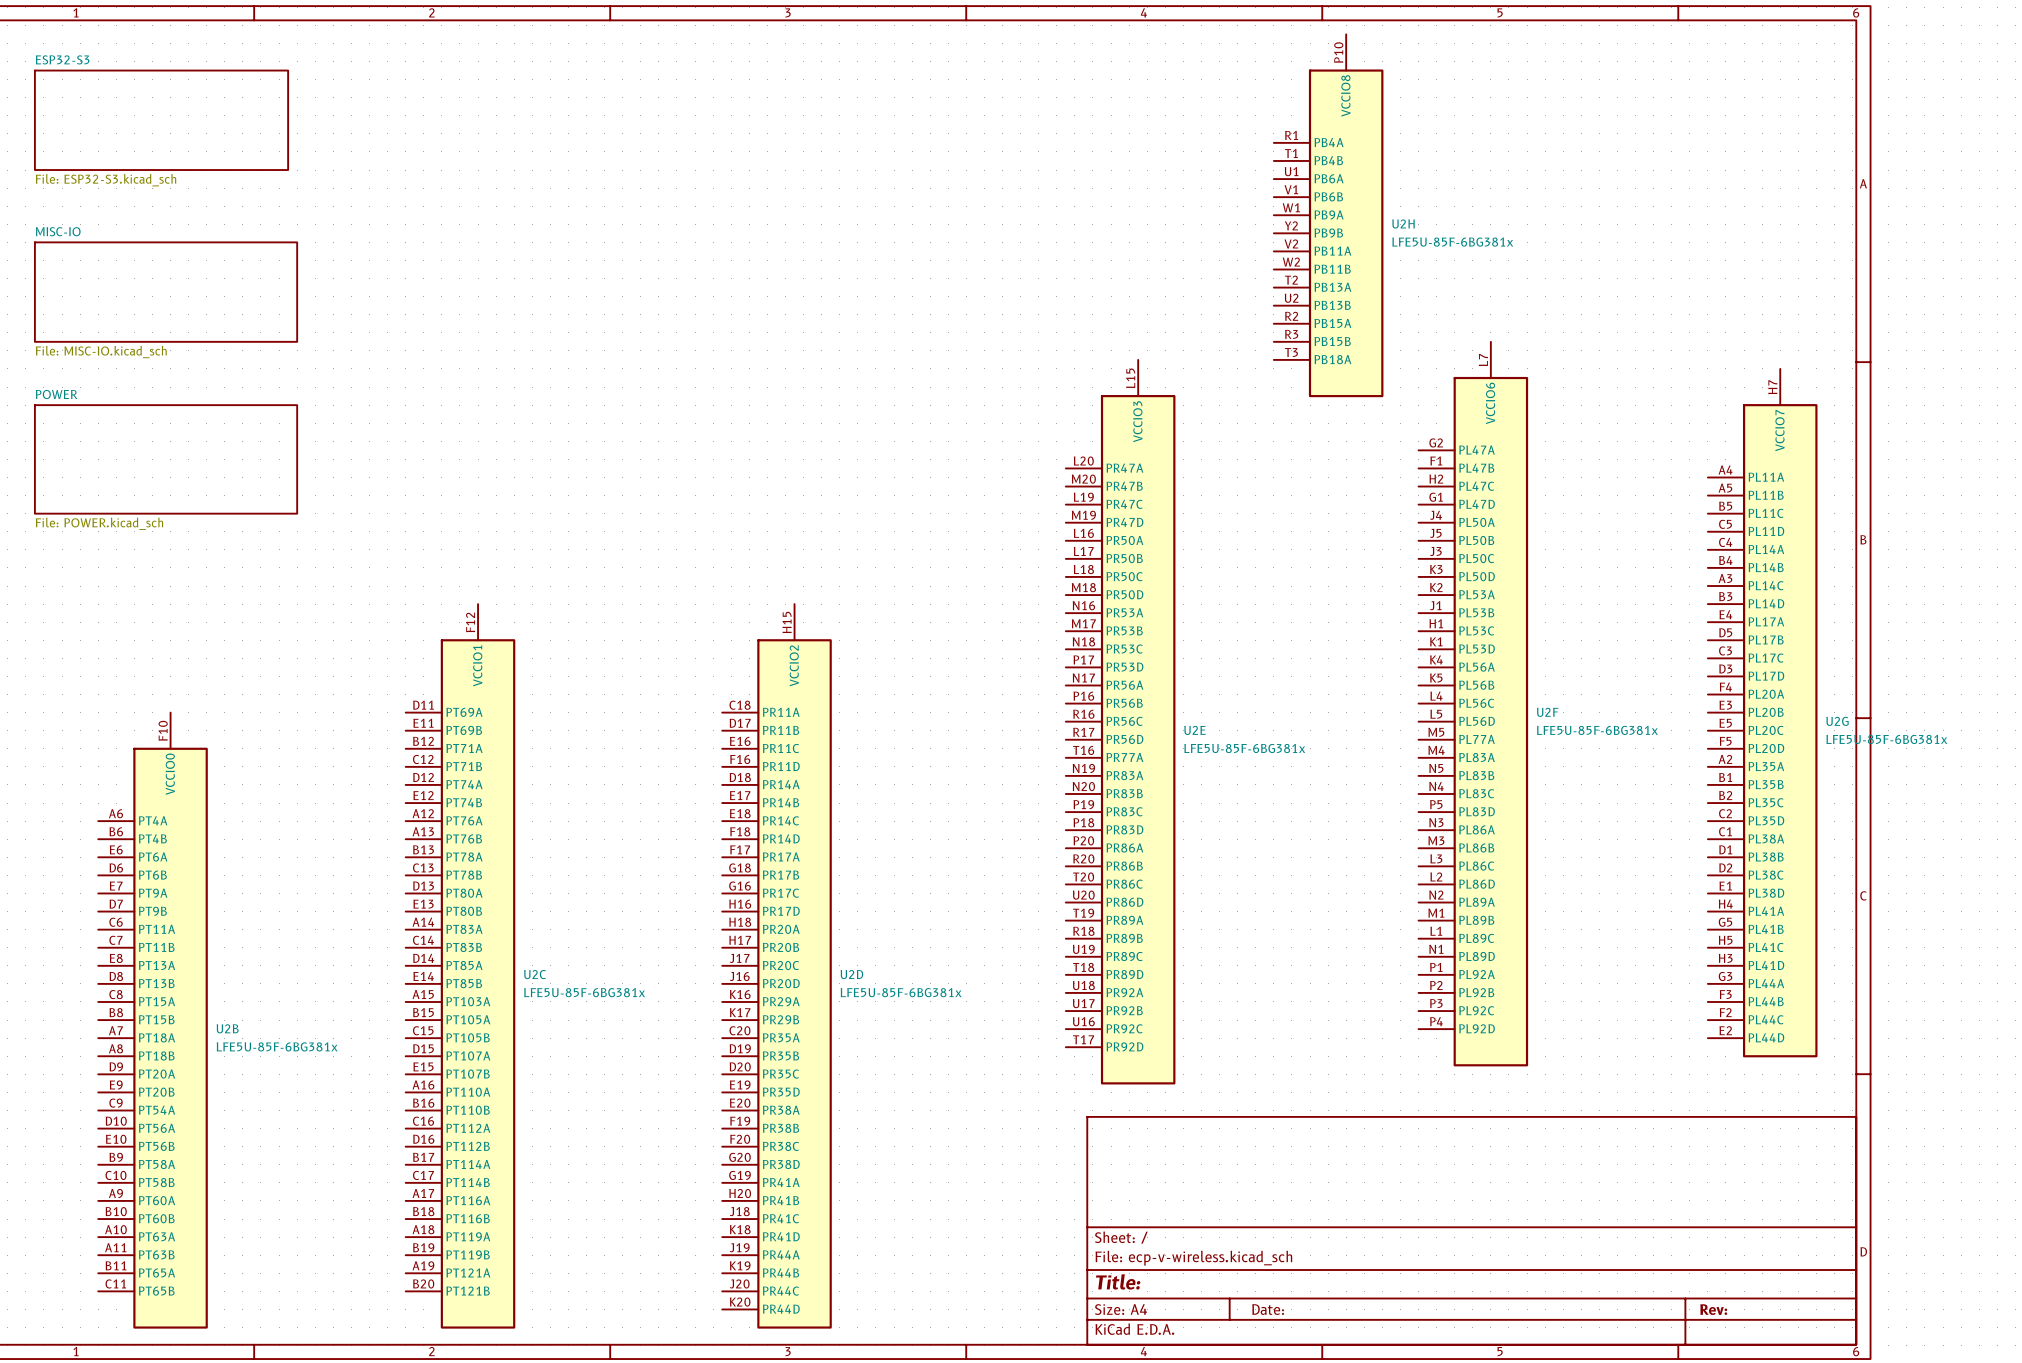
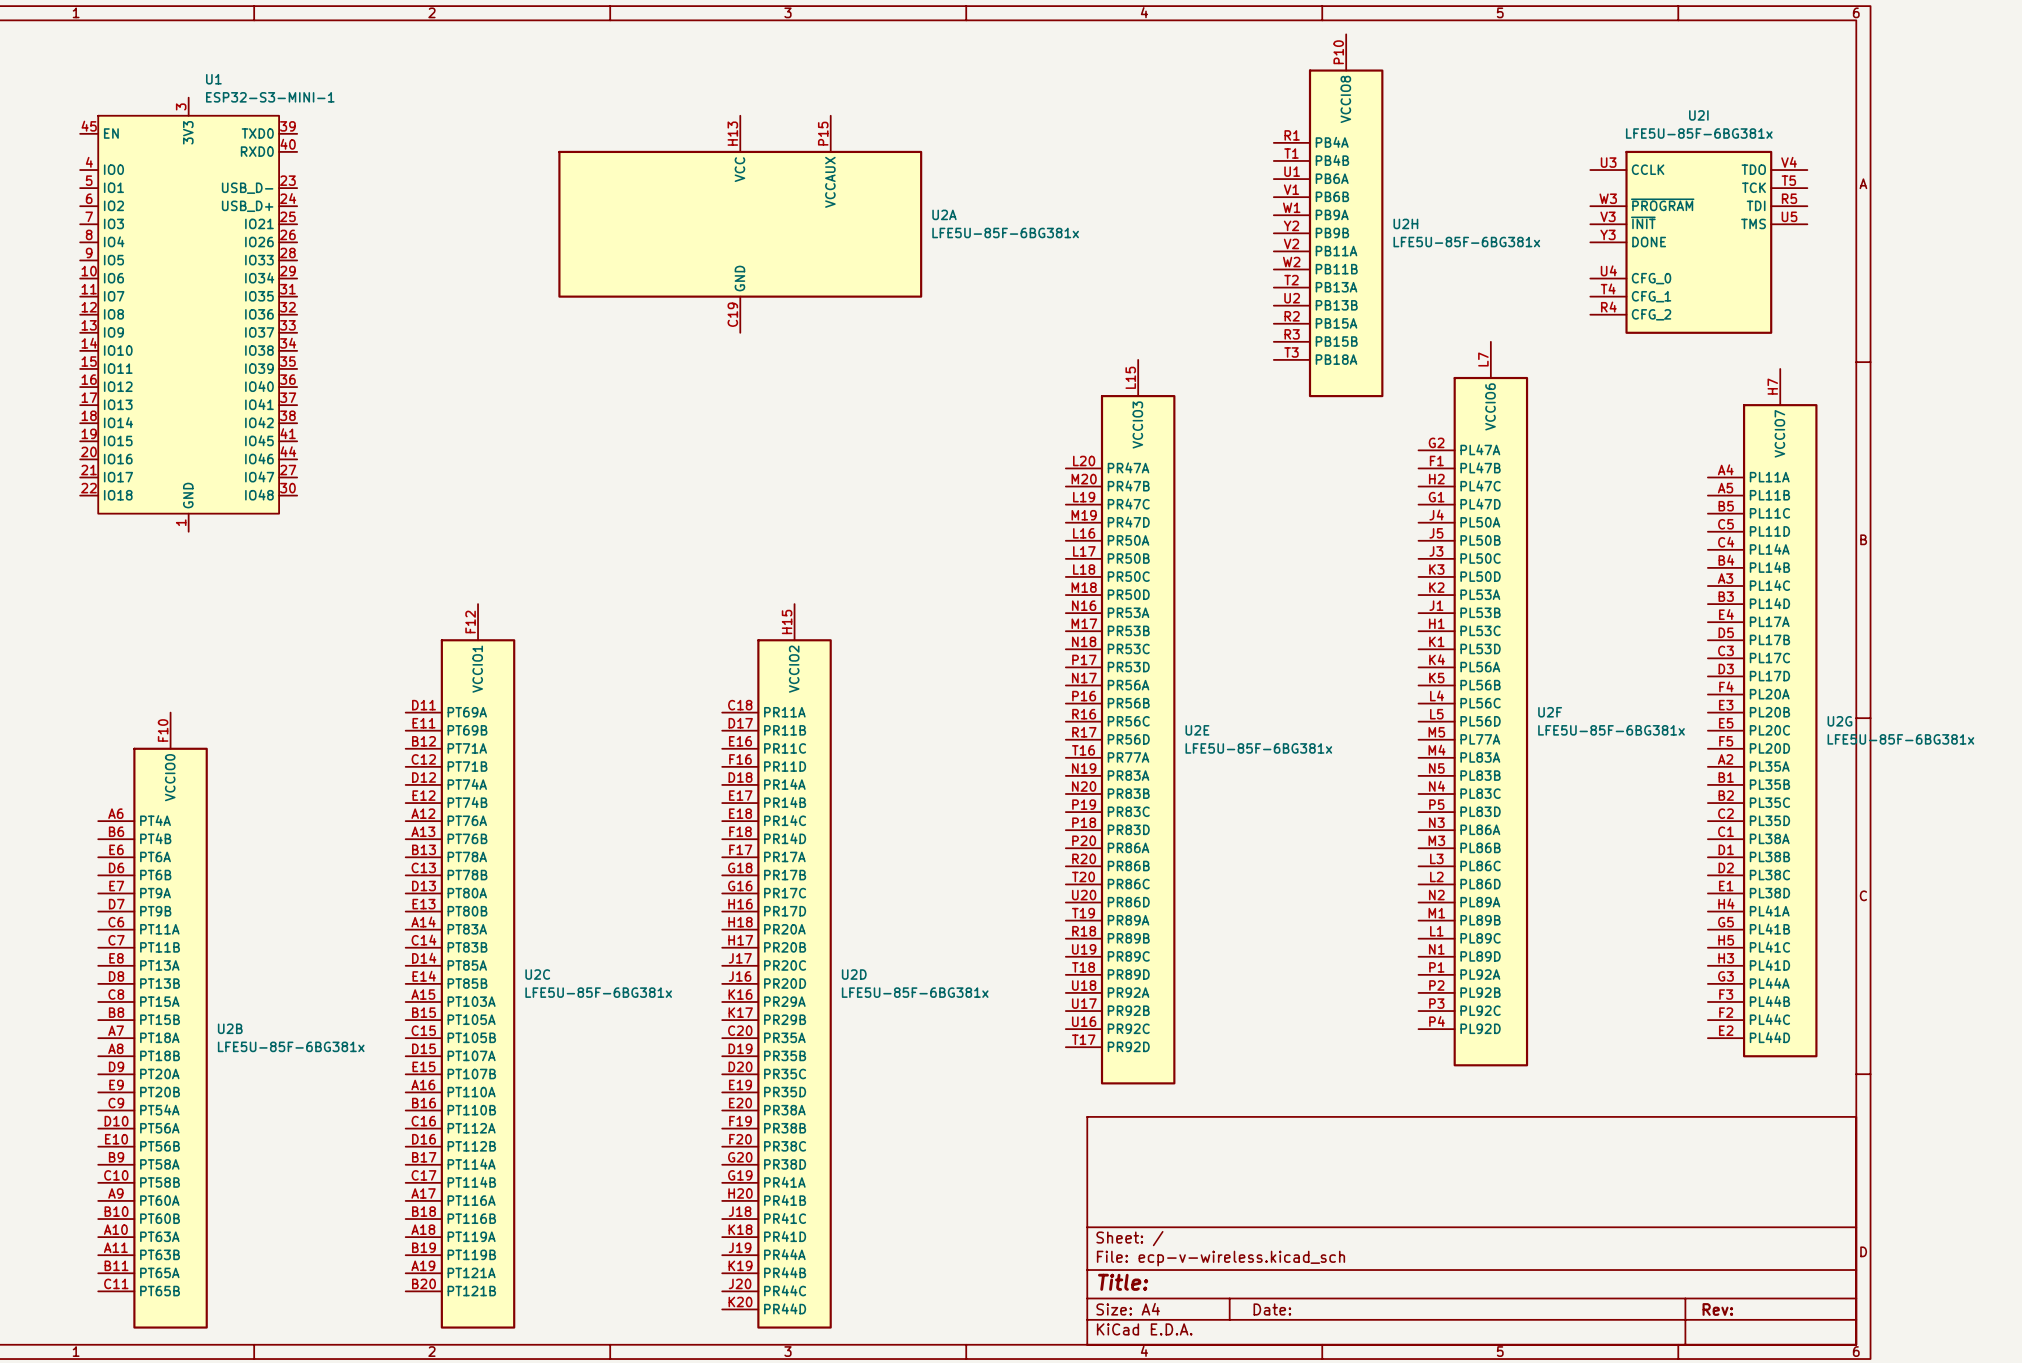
sheet ESP32-S3: File: ESP32-S3.kicad_sch (161, 120) -> none
U2A: none -> LFE5U-85F-6BG381x (740, 224)
U2I: none -> LFE5U-85F-6BG381x (1698, 242)
sheet MISC-IO: File: MISC-IO.kicad_sch (166, 292) -> none
U1: none -> ESP32-S3-MINI-1 (188, 314)
sheet POWER: File: POWER.kicad_sch (166, 459) -> none

